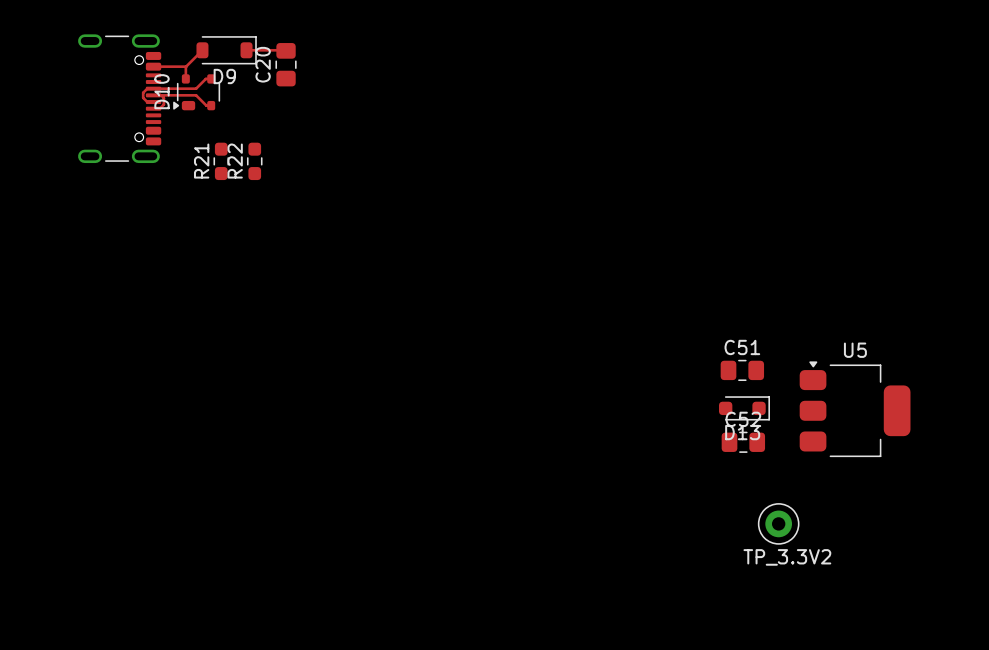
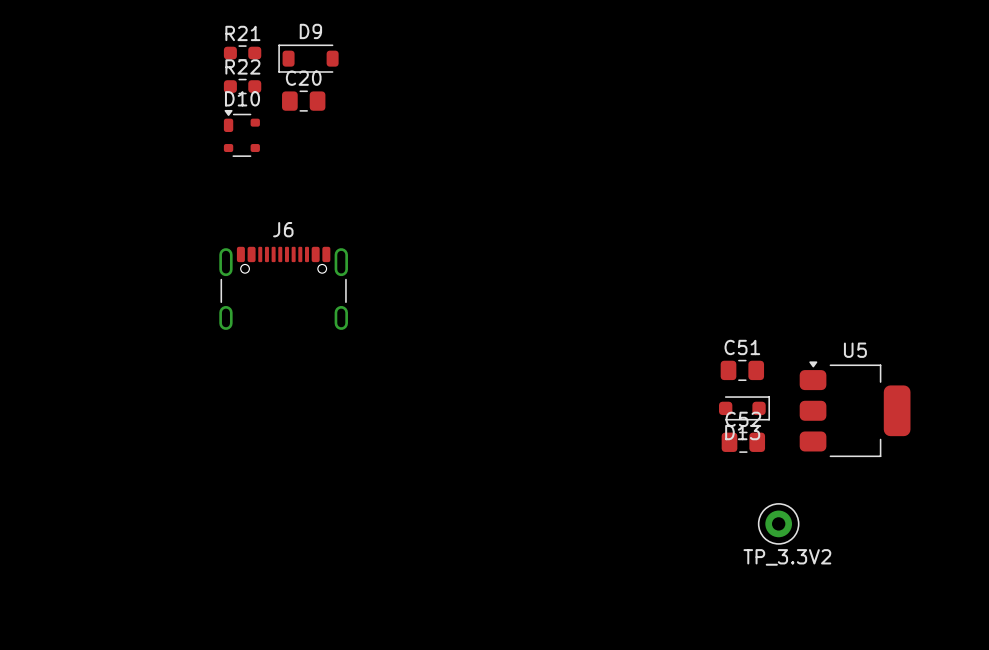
track: (202, 50) (185, 66) (185, 78) -> none
D9 rotation: 0° (226, 50) -> 180° (308, 58)
D9 position: (226, 50) -> (308, 58)
track: (246, 50) (286, 50) -> none
C20 rotation: 0° (286, 64) -> 90° clockwise (303, 101)
C20 position: (286, 64) -> (303, 101)
track: (153, 66) (186, 66) -> none
track: (211, 78) (205, 78) (196, 88) (147, 88) (143, 92) (143, 97) (147, 102) (153, 102) -> none
D10 rotation: 0° (196, 92) -> 90° clockwise (241, 133)
D10 position: (196, 92) -> (241, 133)
track: (153, 95) (196, 95) (206, 105) (211, 105) -> none
track: (161, 95) (163, 98) (163, 104) (159, 108) (153, 108) -> none
part: (119, 98) -> none
R21 rotation: 0° (221, 161) -> 90° clockwise (242, 53)
R21 position: (221, 161) -> (242, 53)
R22 rotation: 0° (254, 161) -> 90° clockwise (242, 86)
R22 position: (254, 161) -> (242, 86)
J6: none -> (283, 288)

